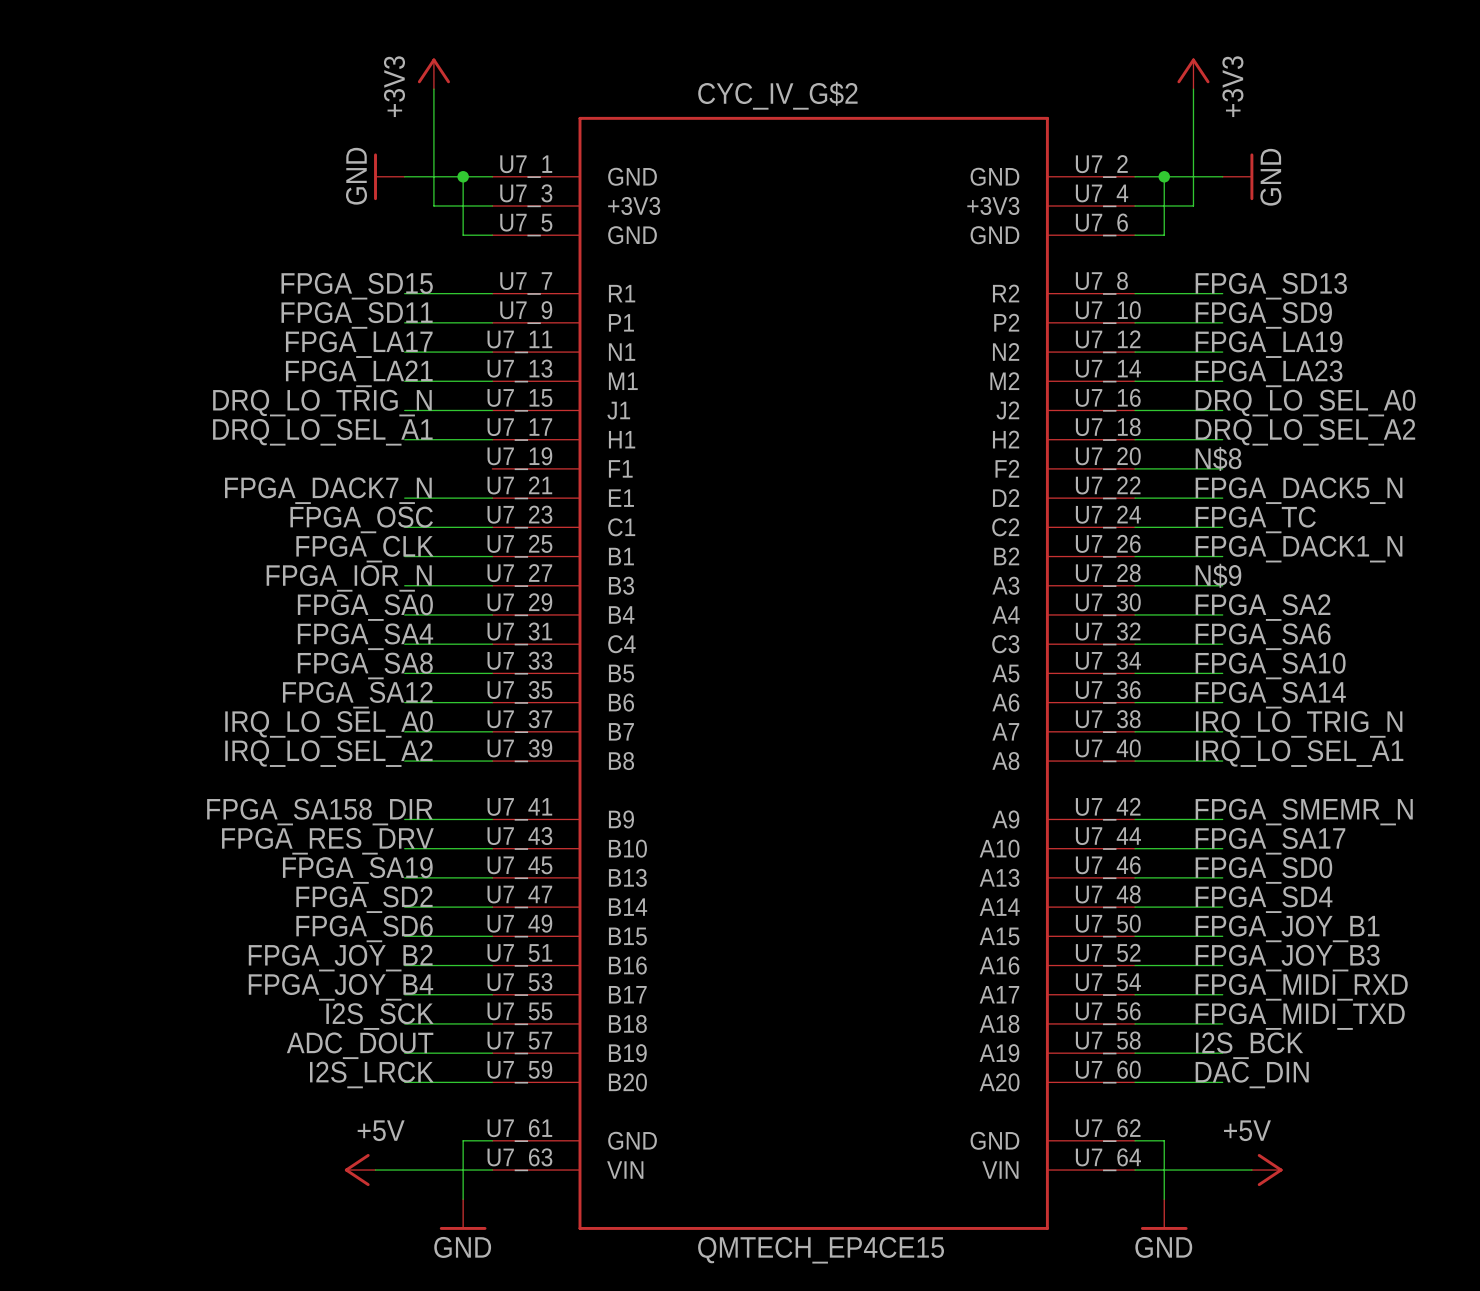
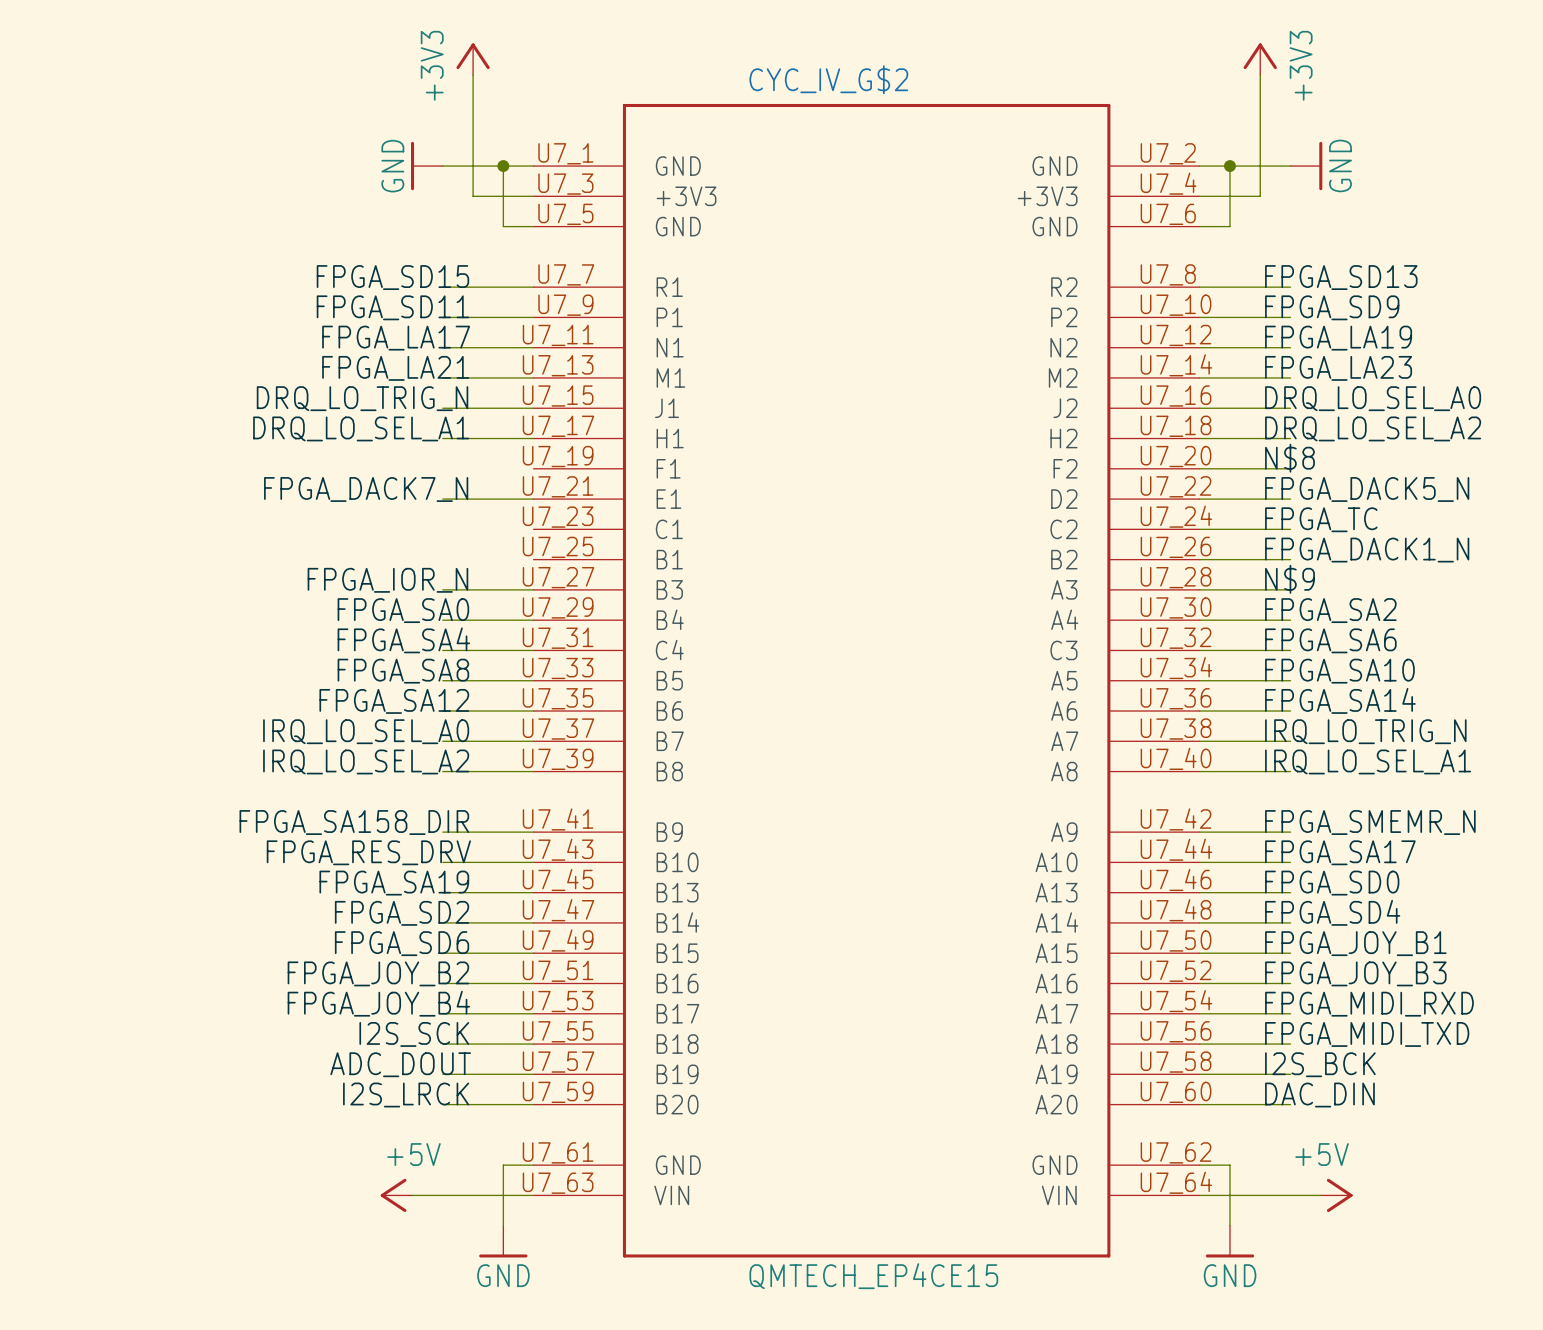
label: FPGA_OSC (361, 519) -> none
wire: (404, 527) (492, 527) -> none
label: FPGA_CLK (365, 549) -> none
wire: (404, 556) (492, 556) -> none

